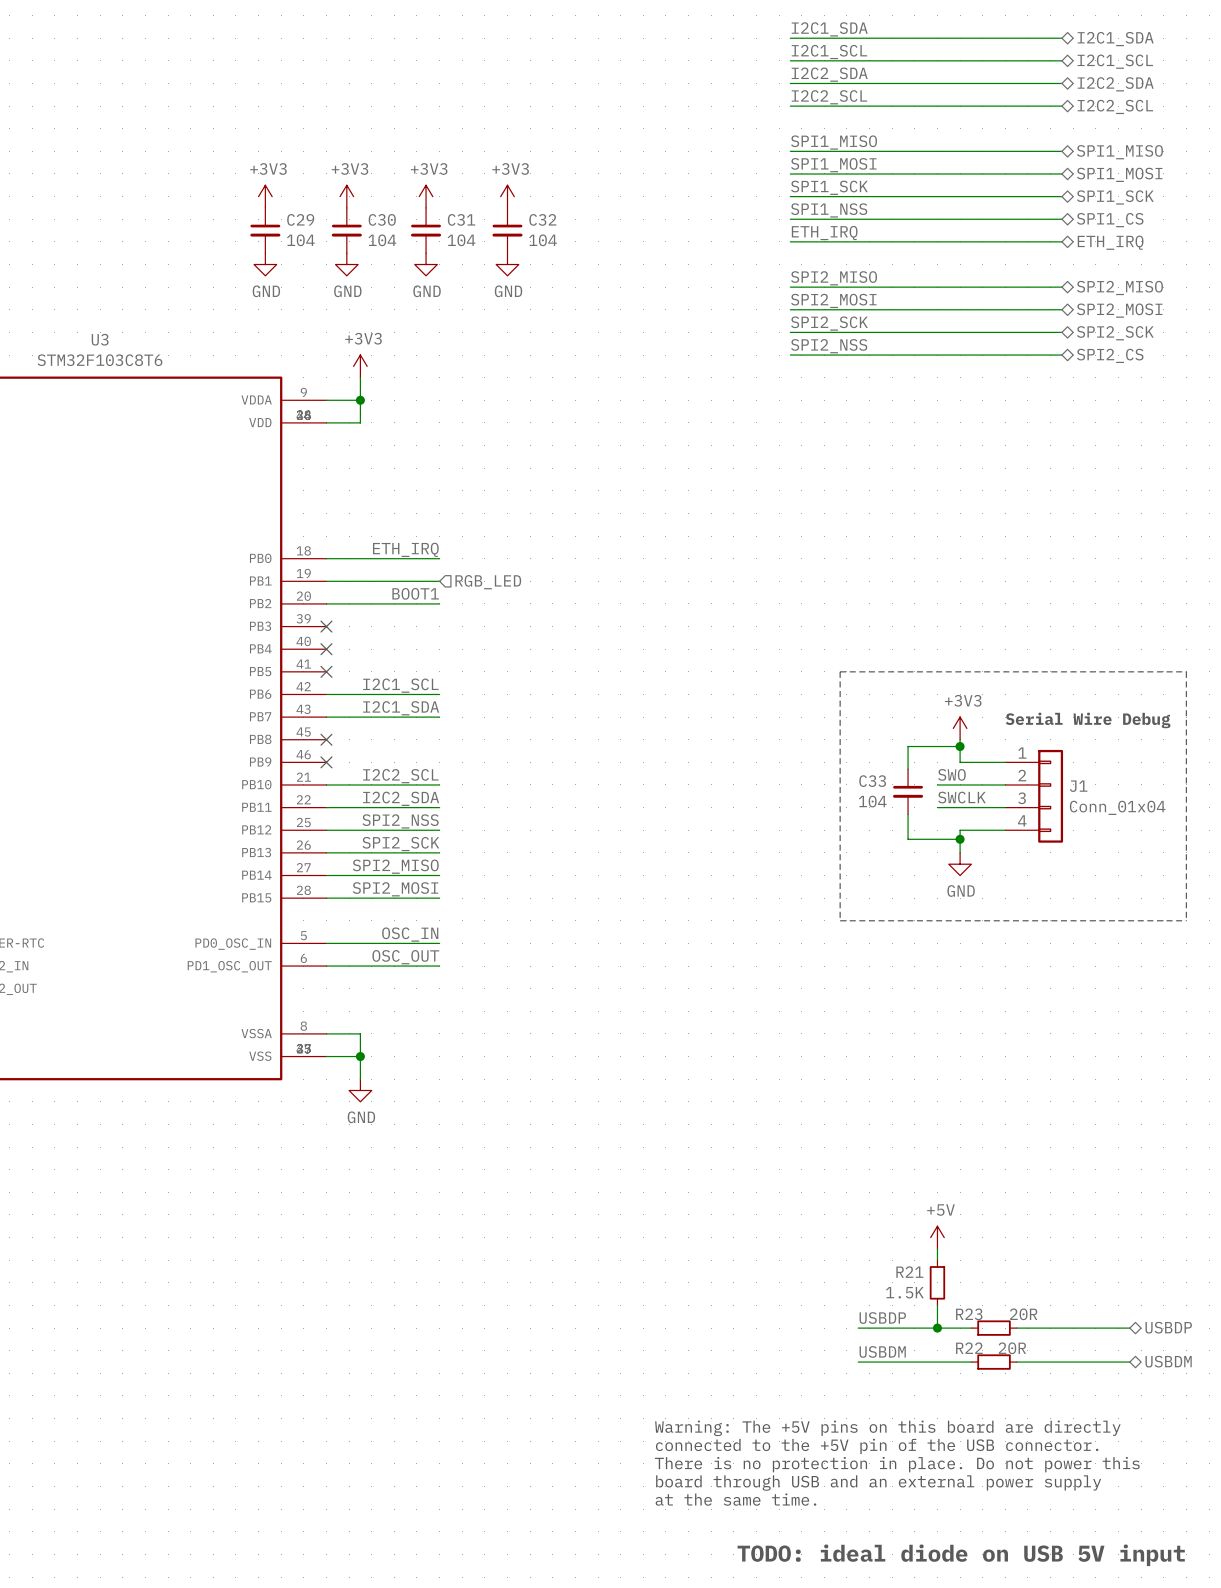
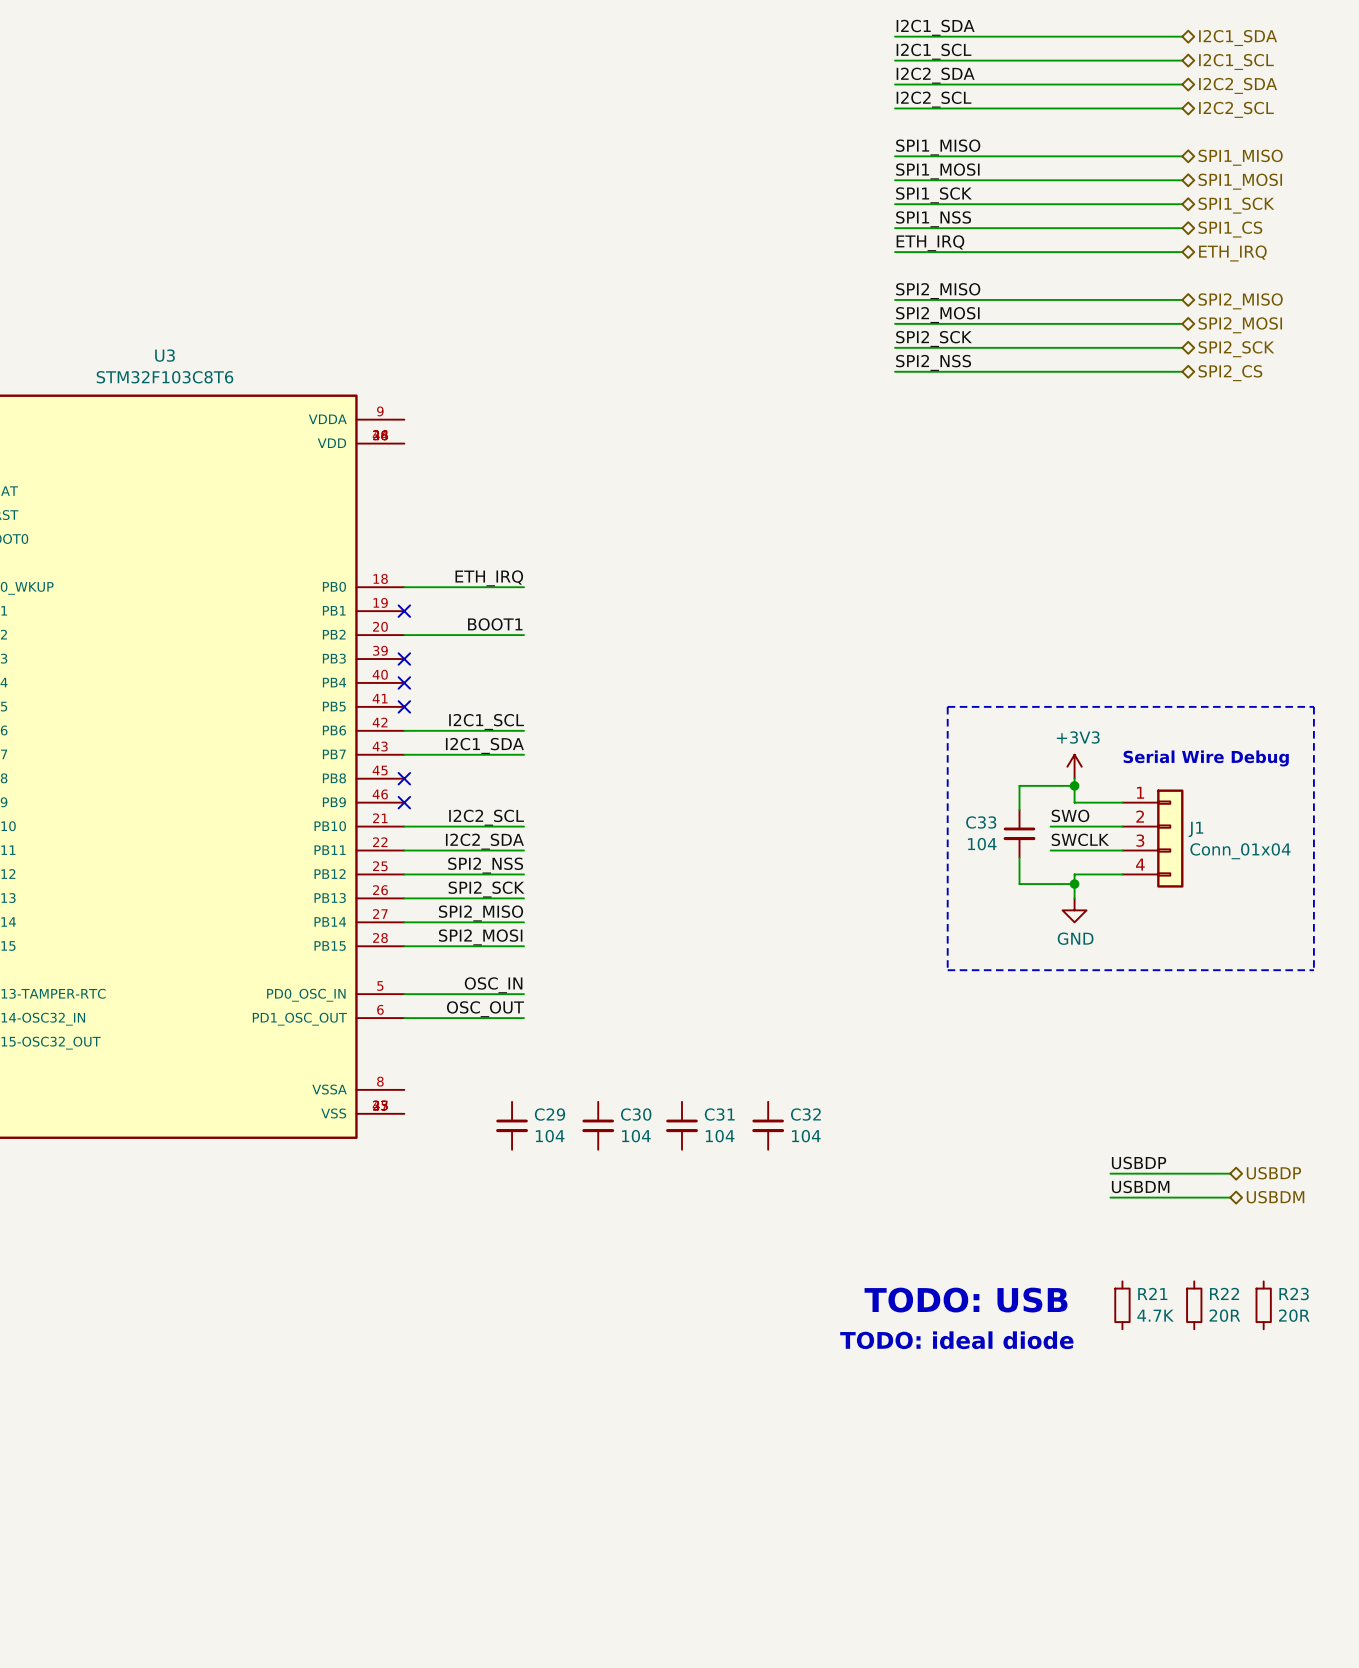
power symbol: +3V3 (265, 196) -> none
power symbol: +3V3 (346, 196) -> none
power symbol: +3V3 (426, 196) -> none
power symbol: +3V3 (507, 196) -> none
C29 position: (265, 230) -> (512, 1125)
C30 position: (346, 230) -> (598, 1125)
C31 position: (426, 230) -> (682, 1125)
C32 position: (507, 230) -> (768, 1125)
power symbol: GND (265, 264) -> none
power symbol: GND (346, 264) -> none
power symbol: GND (426, 264) -> none
power symbol: GND (507, 264) -> none
power symbol: +3V3 (360, 366) -> none
wire: (360, 377) (360, 422) (326, 422) -> none
wire: (326, 400) (360, 400) -> none
junction: (360, 400) -> none
wire: (326, 581) (439, 581) -> none
no-connect mark: none -> (404, 611)
hierarchical label: RGB_LED (488, 582) -> none
wire: (326, 1033) (360, 1033) (360, 1079) -> none
wire: (326, 1056) (360, 1056) -> none
junction: (360, 1056) -> none
power symbol: GND (360, 1090) -> none
label: none -> USBDP (1139, 1163)
wire: none -> (1110, 1173) (1230, 1173)
label: none -> USBDM (1140, 1186)
hierarchical label: none -> USBDM (1275, 1197)
text: none -> TODO: USB (966, 1300)
power symbol: +5V (937, 1237) -> none
wire: (937, 1248) (937, 1260) -> none
text: none -> TODO: ideal diode (956, 1340)
R21 name position: R21 (909, 1272) -> R21 (1152, 1293)
R21 position: (937, 1282) -> (1122, 1305)
R21 value: 1.5K (904, 1292) -> 4.7K (1155, 1315)
wire: (937, 1305) (937, 1328) -> none
R23 name position: R23 (969, 1314) -> R23 (1294, 1294)
R23 value position: 20R (1023, 1314) -> 20R (1294, 1315)
label: USBDP (882, 1318) -> none
hierarchical label position: USBDP (1168, 1327) -> USBDP (1273, 1173)
wire: (858, 1328) (971, 1328) -> none
junction: (937, 1328) -> none
R23 rotation: 0° (994, 1328) -> 90° clockwise (1263, 1305)
R23 position: (994, 1328) -> (1263, 1305)
wire: (1016, 1328) (1129, 1328) -> (1110, 1197) (1230, 1197)
R22 name position: R22 (969, 1348) -> R22 (1224, 1293)
R22 value position: 20R (1012, 1348) -> 20R (1224, 1315)
label: USBDM (882, 1351) -> none
hierarchical label: USBDM (1168, 1361) -> none
wire: (858, 1362) (971, 1362) -> none
R22 rotation: 0° (994, 1362) -> 90° clockwise (1194, 1305)
R22 position: (994, 1362) -> (1194, 1305)
wire: (1016, 1362) (1129, 1362) -> none
text: Warning: The +5V pins on this board are directly (887, 1428) -> none
text: connected to the +5V pin of the USB connector. (877, 1446) -> none
text: There is no protection in place. Do not power this (897, 1464) -> none
text: board through USB and an external power supply (878, 1483) -> none
text: at the same time. (735, 1499) -> none
text: TODO: ideal diode on USB 5V input (961, 1555) -> none

